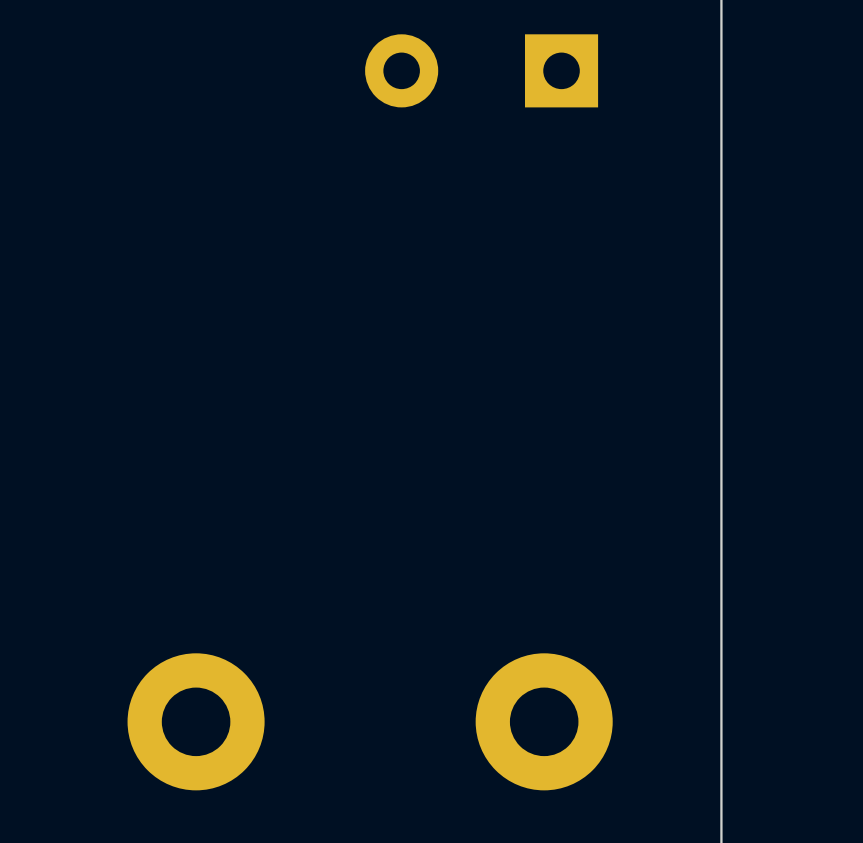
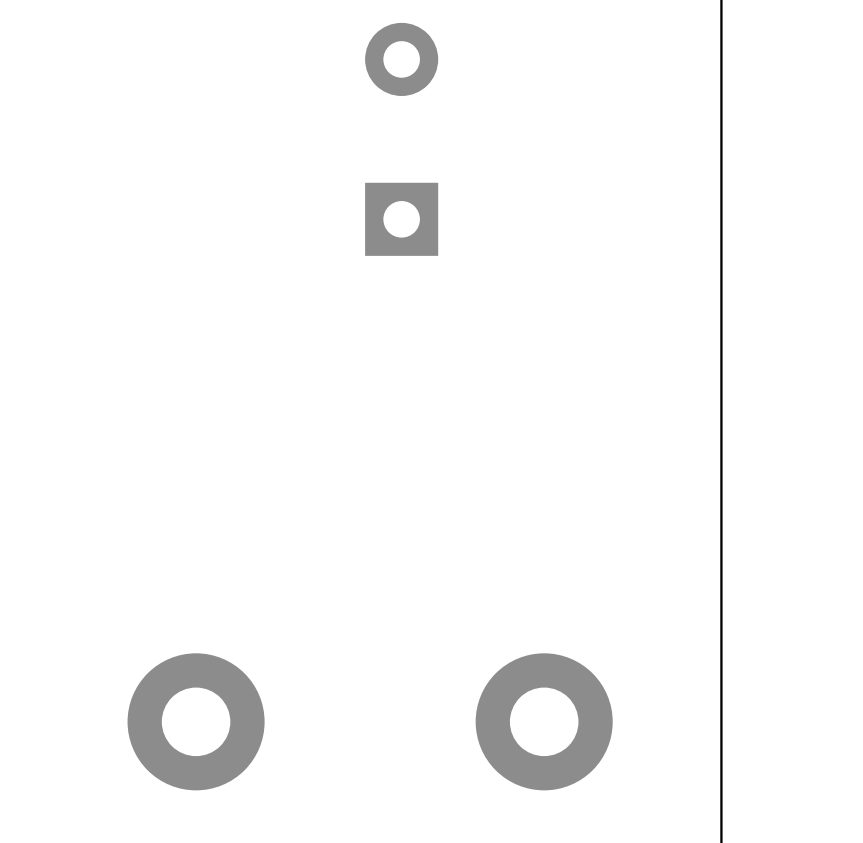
part rotation: 0° (481, 70) -> 90° clockwise (401, 139)

